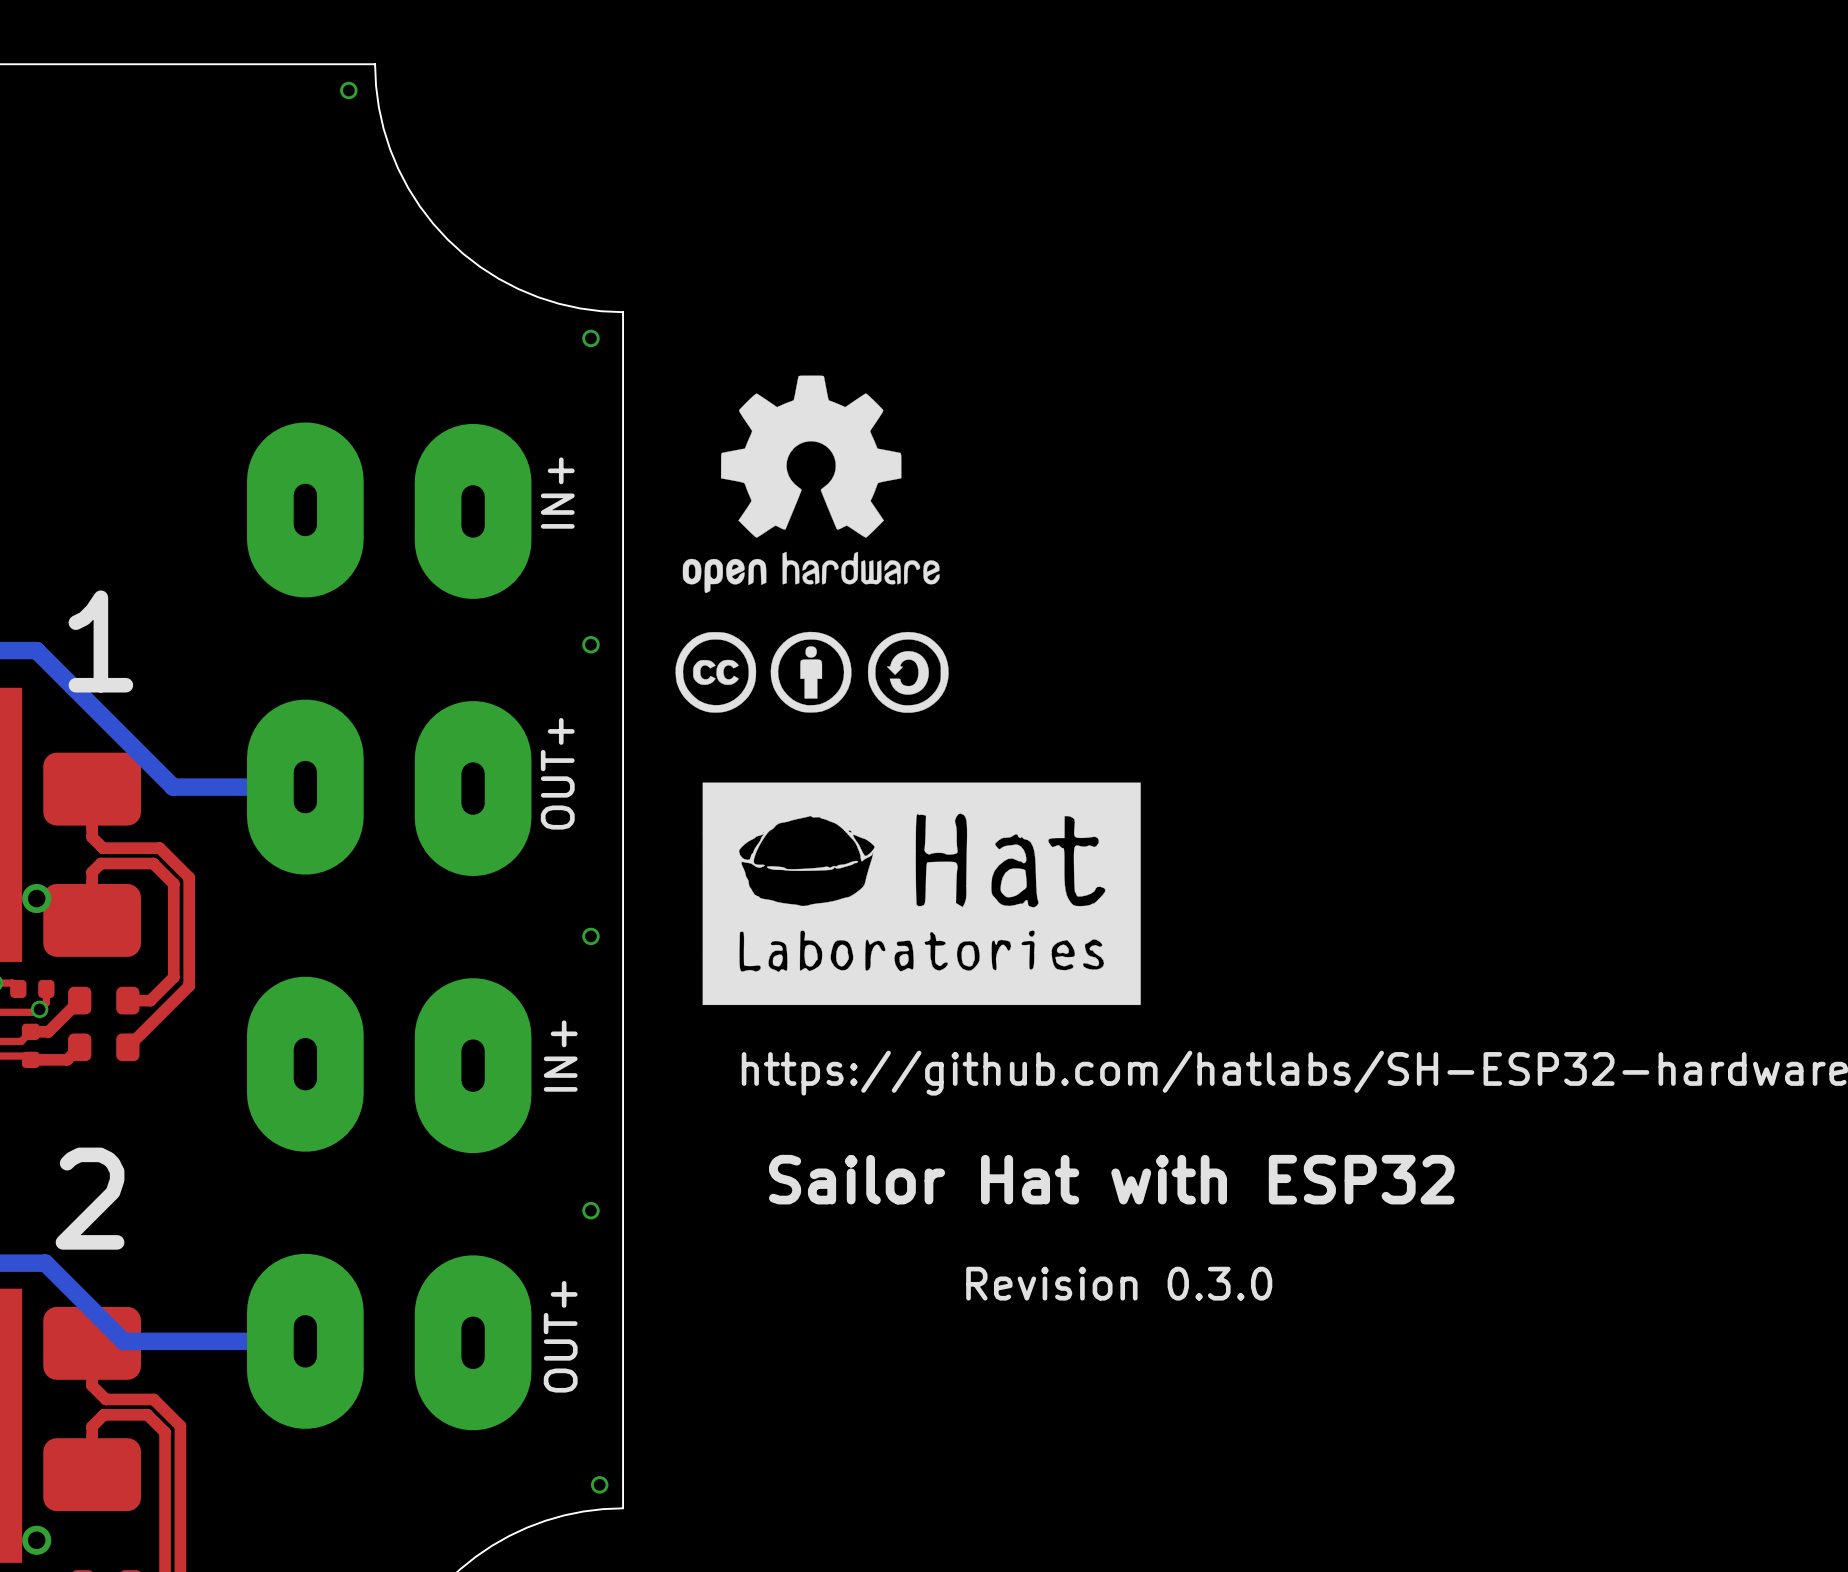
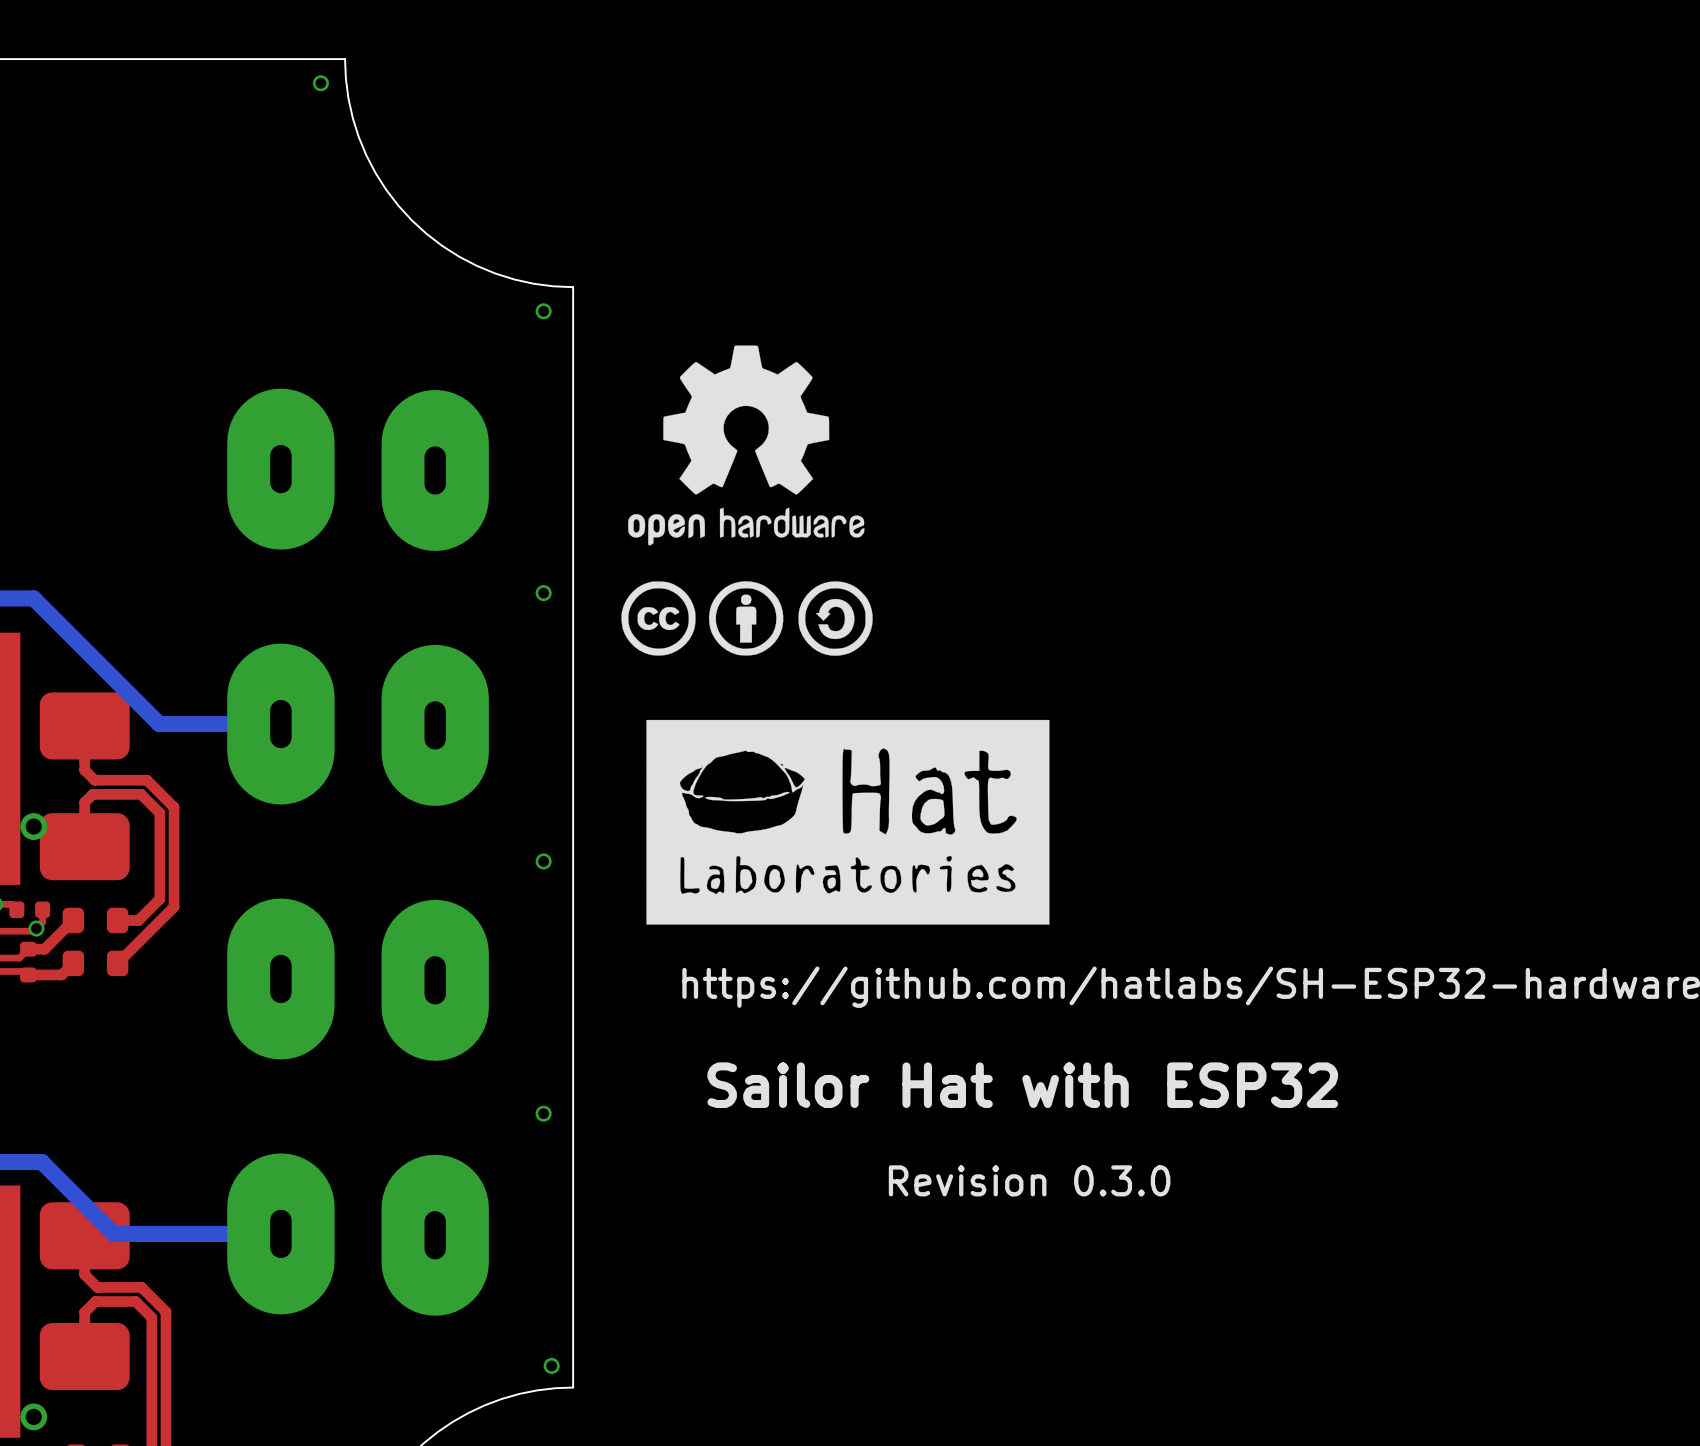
text: IN+ (557, 493) -> none
text: 1 (100, 641) -> none
text: OUT+ (557, 773) -> none
text: IN+ (560, 1056) -> none
text: 2 (90, 1198) -> none
text: OUT+ (560, 1336) -> none

